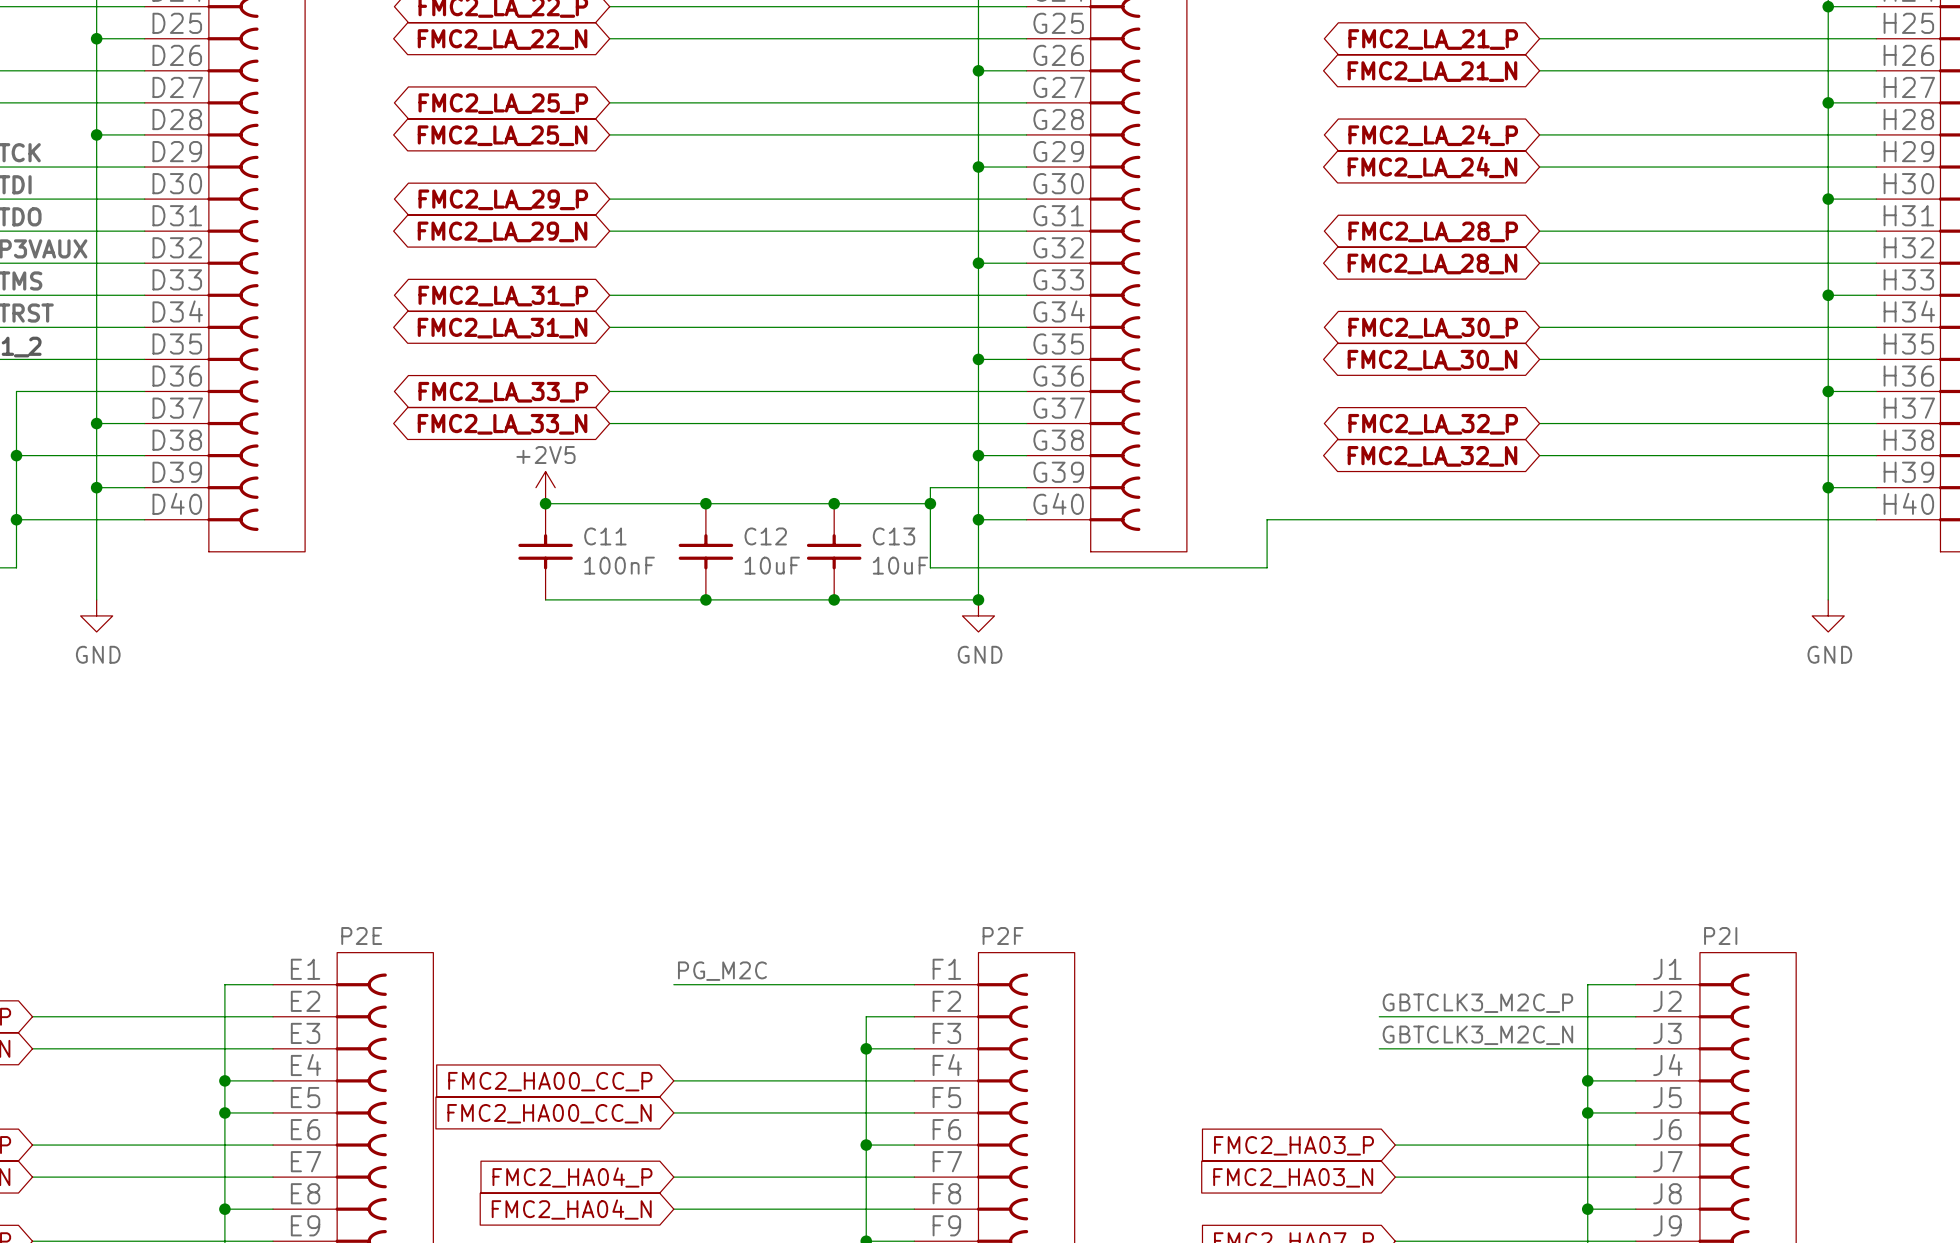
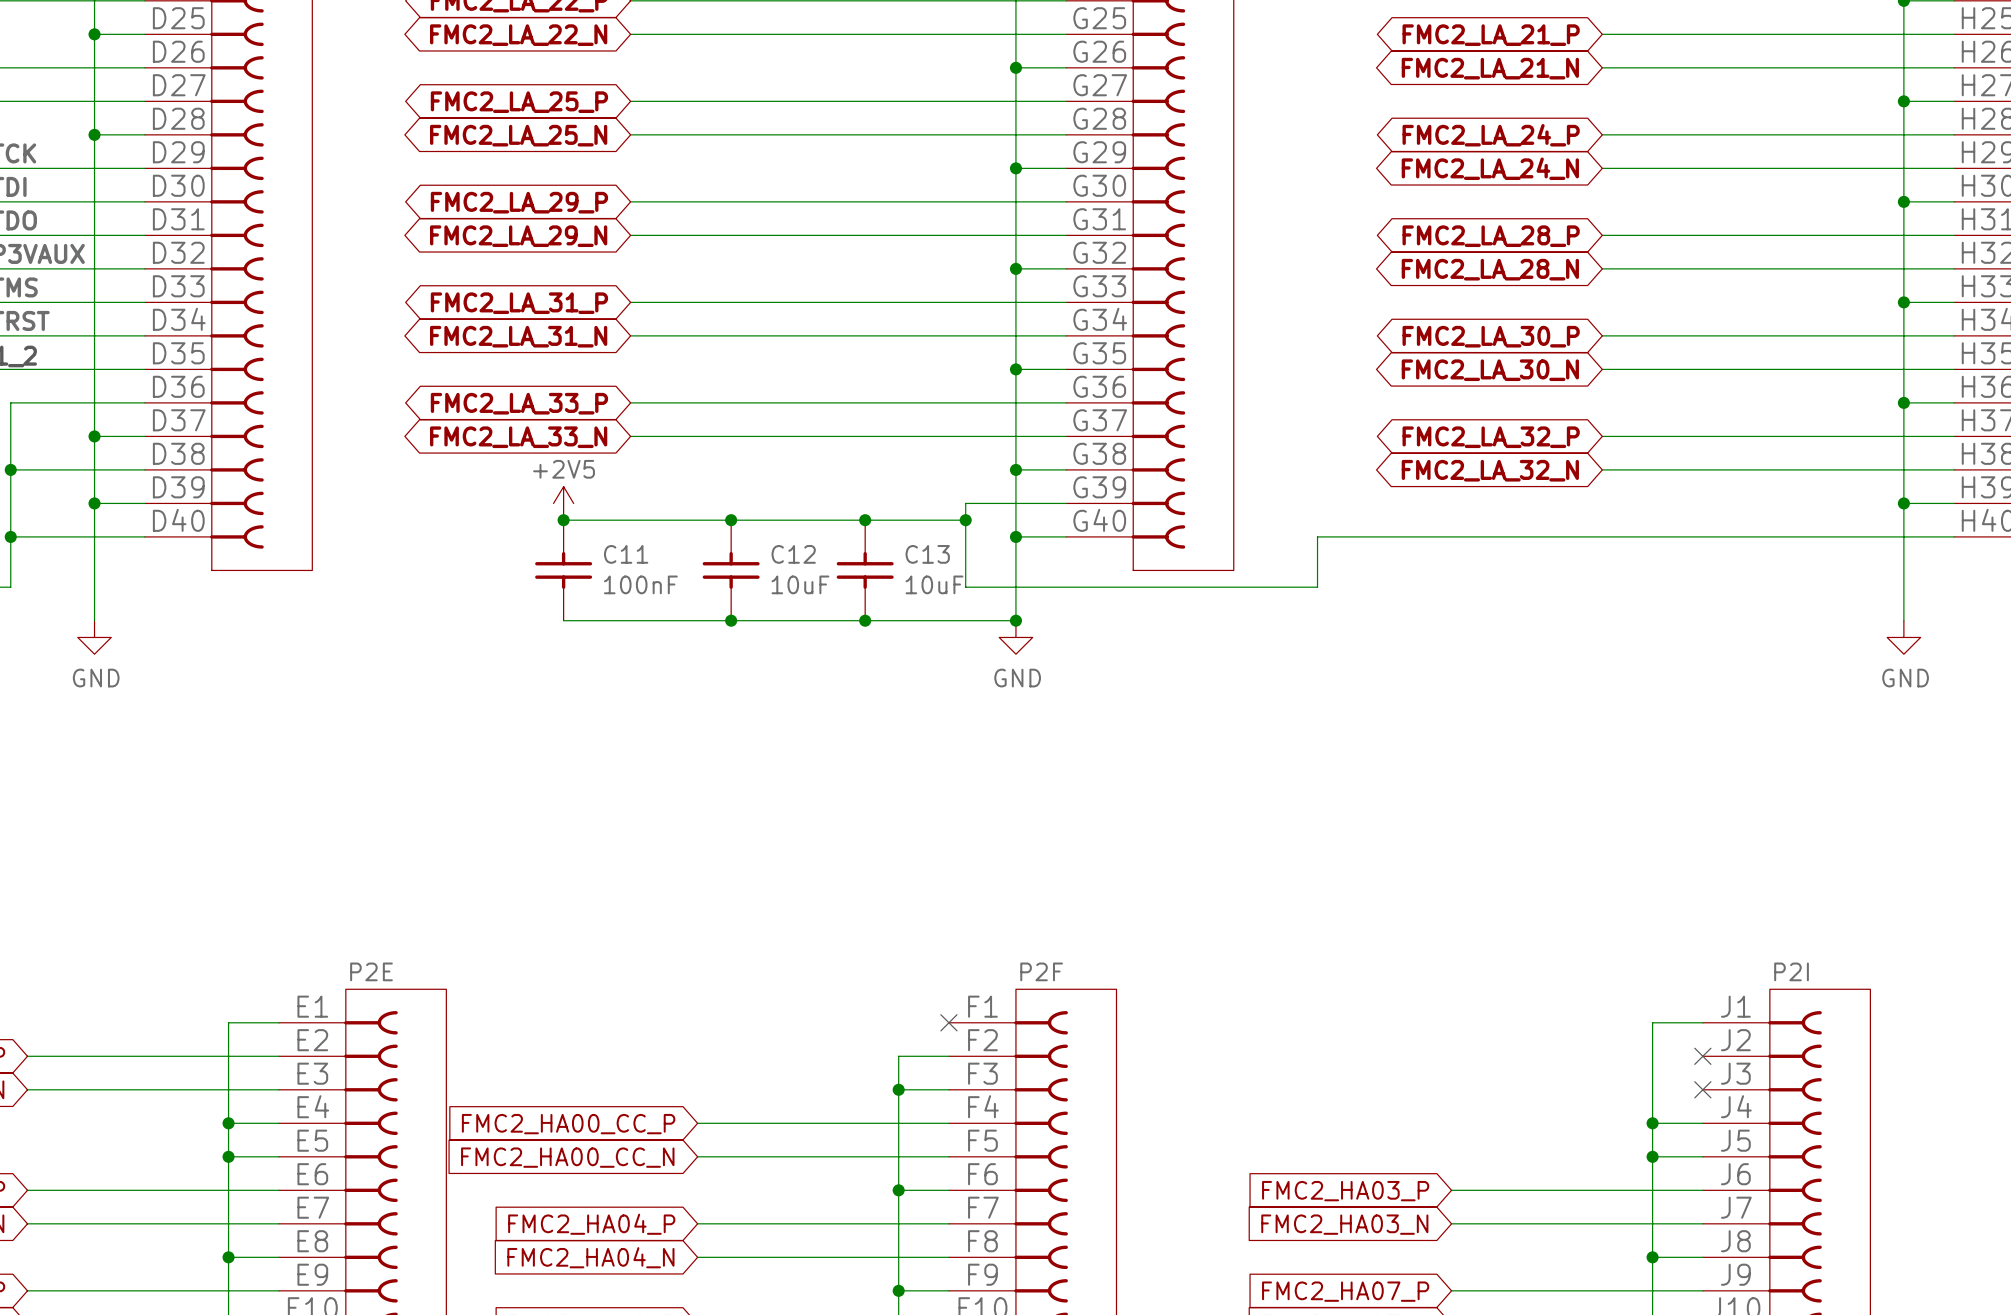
label: PG_M2C (722, 971) -> none
wire: (673, 984) (914, 984) -> none
no-connect mark: none -> (948, 1022)
label: GBTCLK3_M2C_P (1477, 1003) -> none
wire: (1379, 1016) (1635, 1016) -> none
no-connect mark: none -> (1702, 1056)
label: GBTCLK3_M2C_N (1477, 1035) -> none
wire: (1379, 1048) (1635, 1048) -> none
no-connect mark: none -> (1702, 1089)

